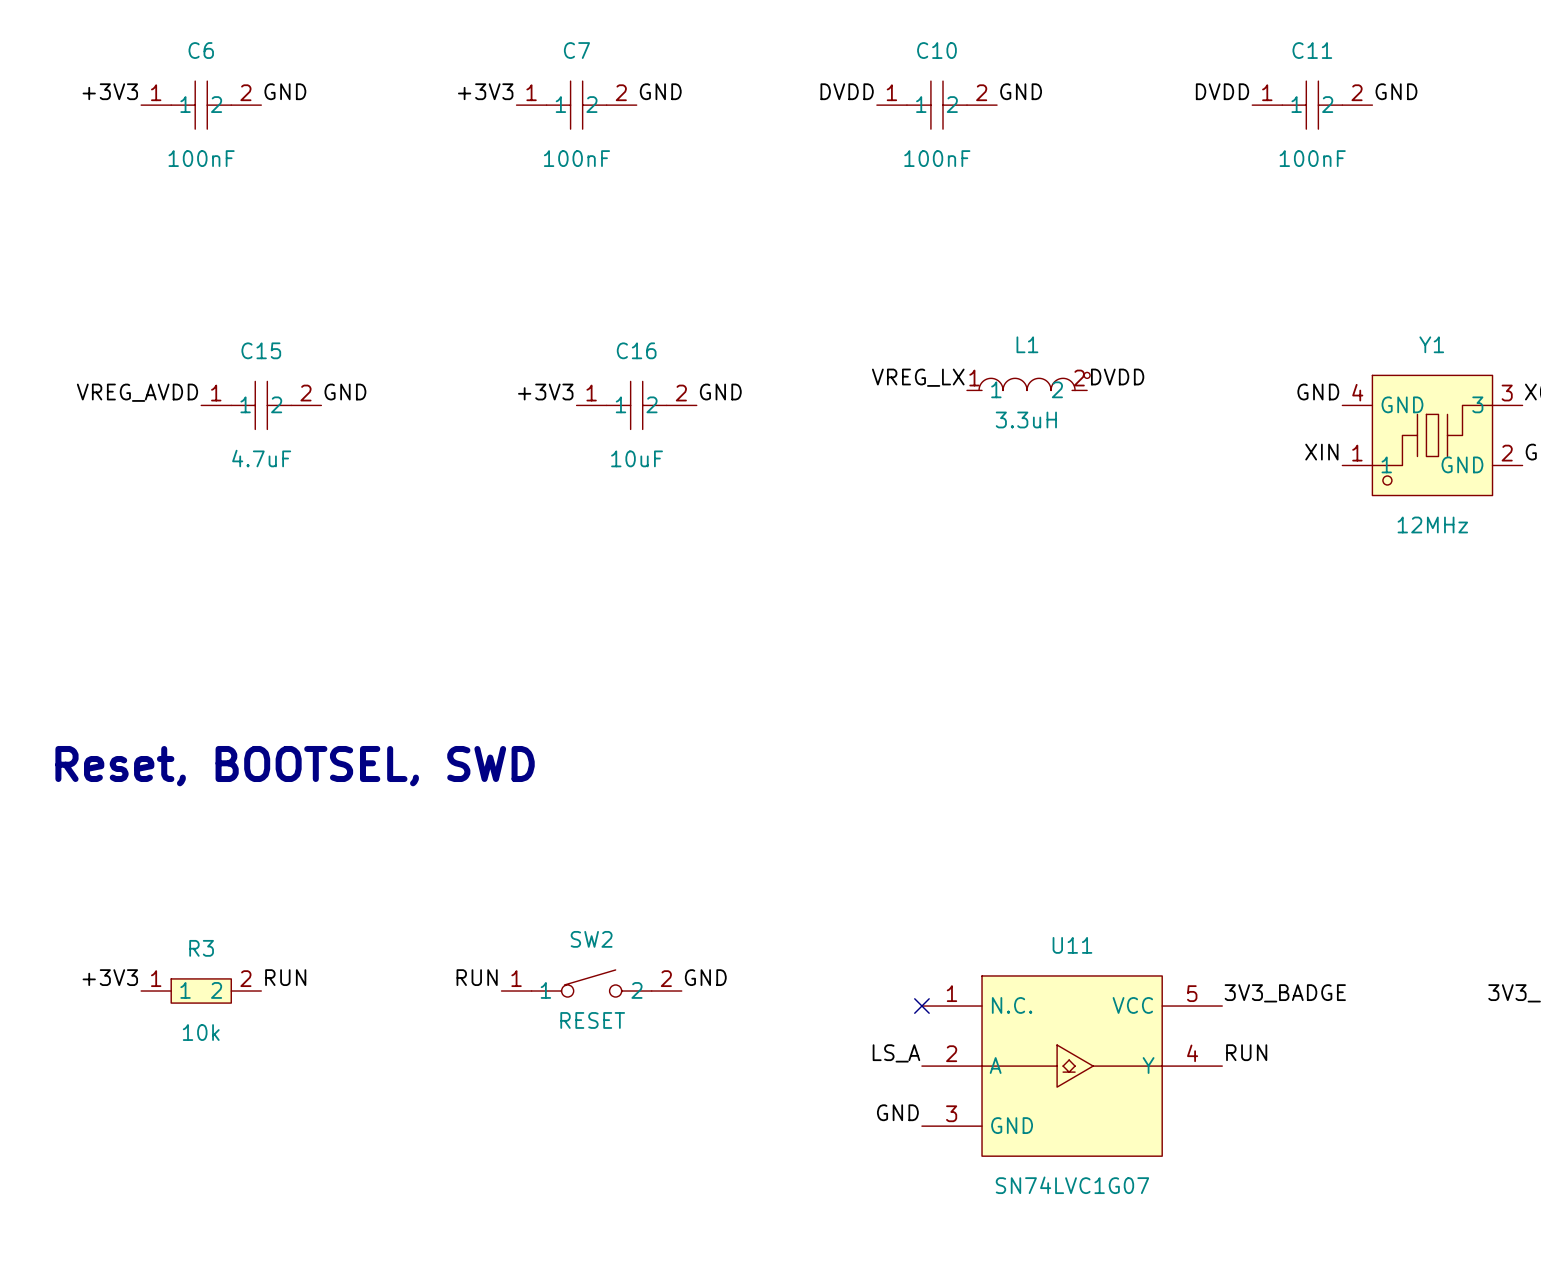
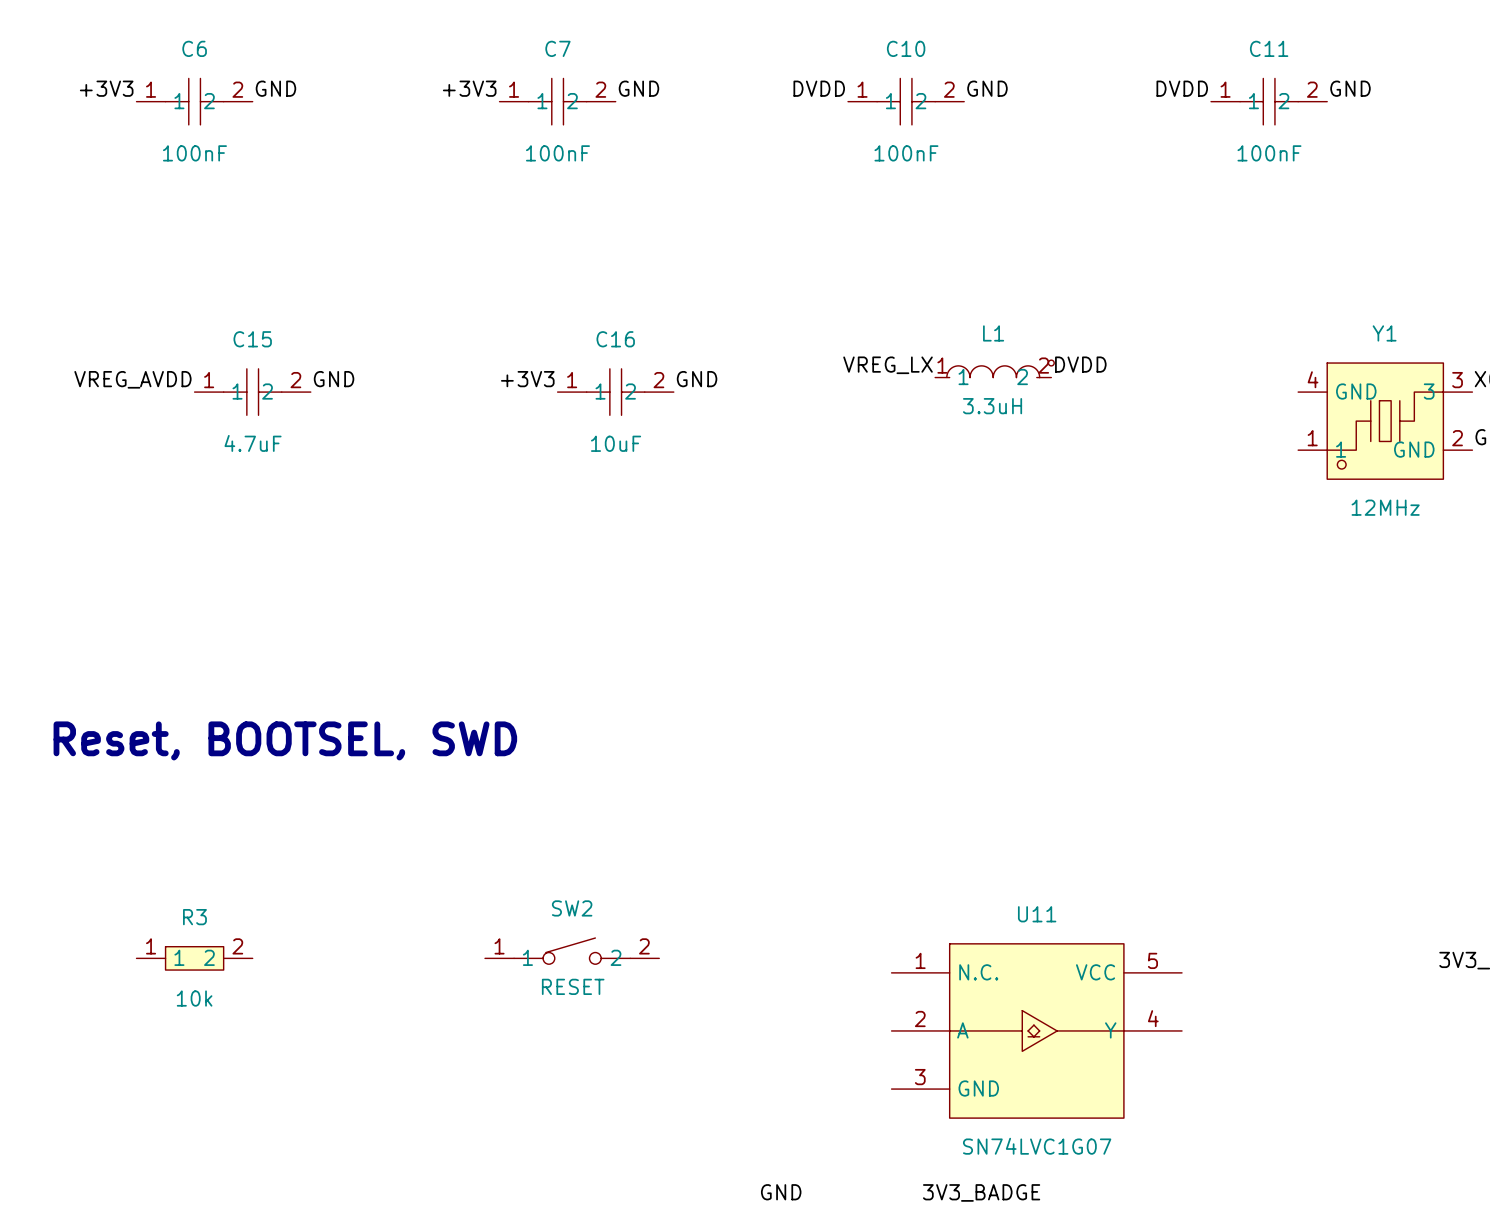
label: GND (1318, 392) -> none
label: XIN (1321, 452) -> none
label: +3V3 (110, 977) -> none
label: RUN (285, 977) -> none
label: RUN (477, 977) -> none
label: GND (705, 977) -> none
label: 3V3_BADGE (1285, 993) -> none
no-connect mark: (921, 1006) -> none
label: RUN (1246, 1052) -> none
label: LS_A (896, 1053) -> none
label: GND (897, 1112) -> none
label: none -> GND (781, 1192)
label: none -> 3V3_BADGE (981, 1192)

